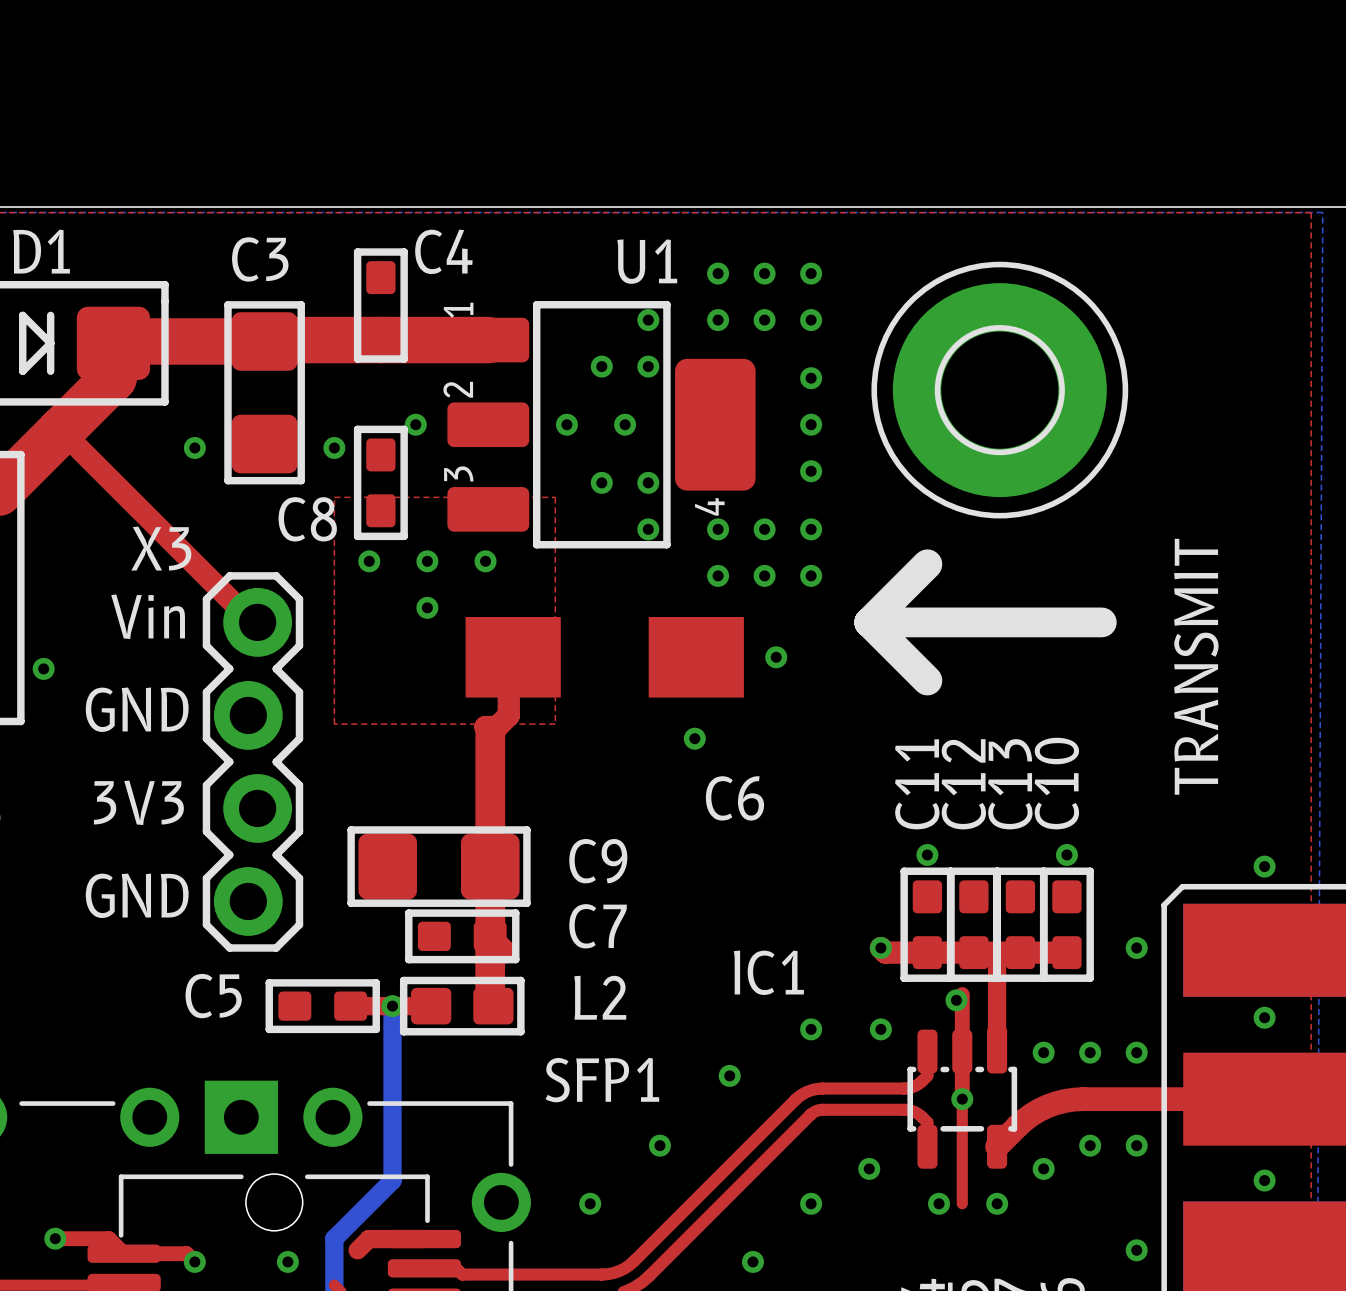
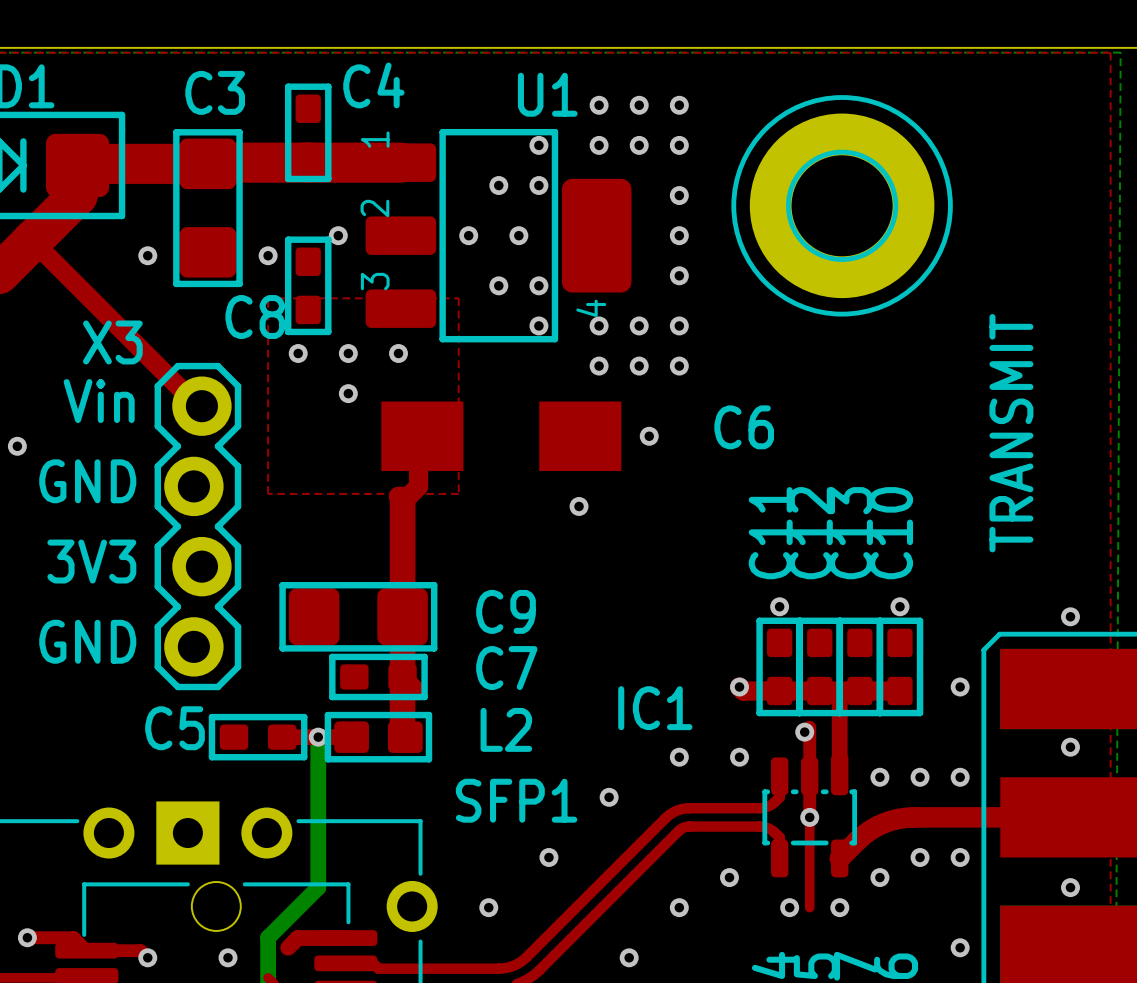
line: (927, 564) (869, 622) -> none
line: (869, 622) (1101, 622) -> none
line: (869, 622) (927, 680) -> none
C6 name position: C6 (734, 798) -> C6 (744, 427)

